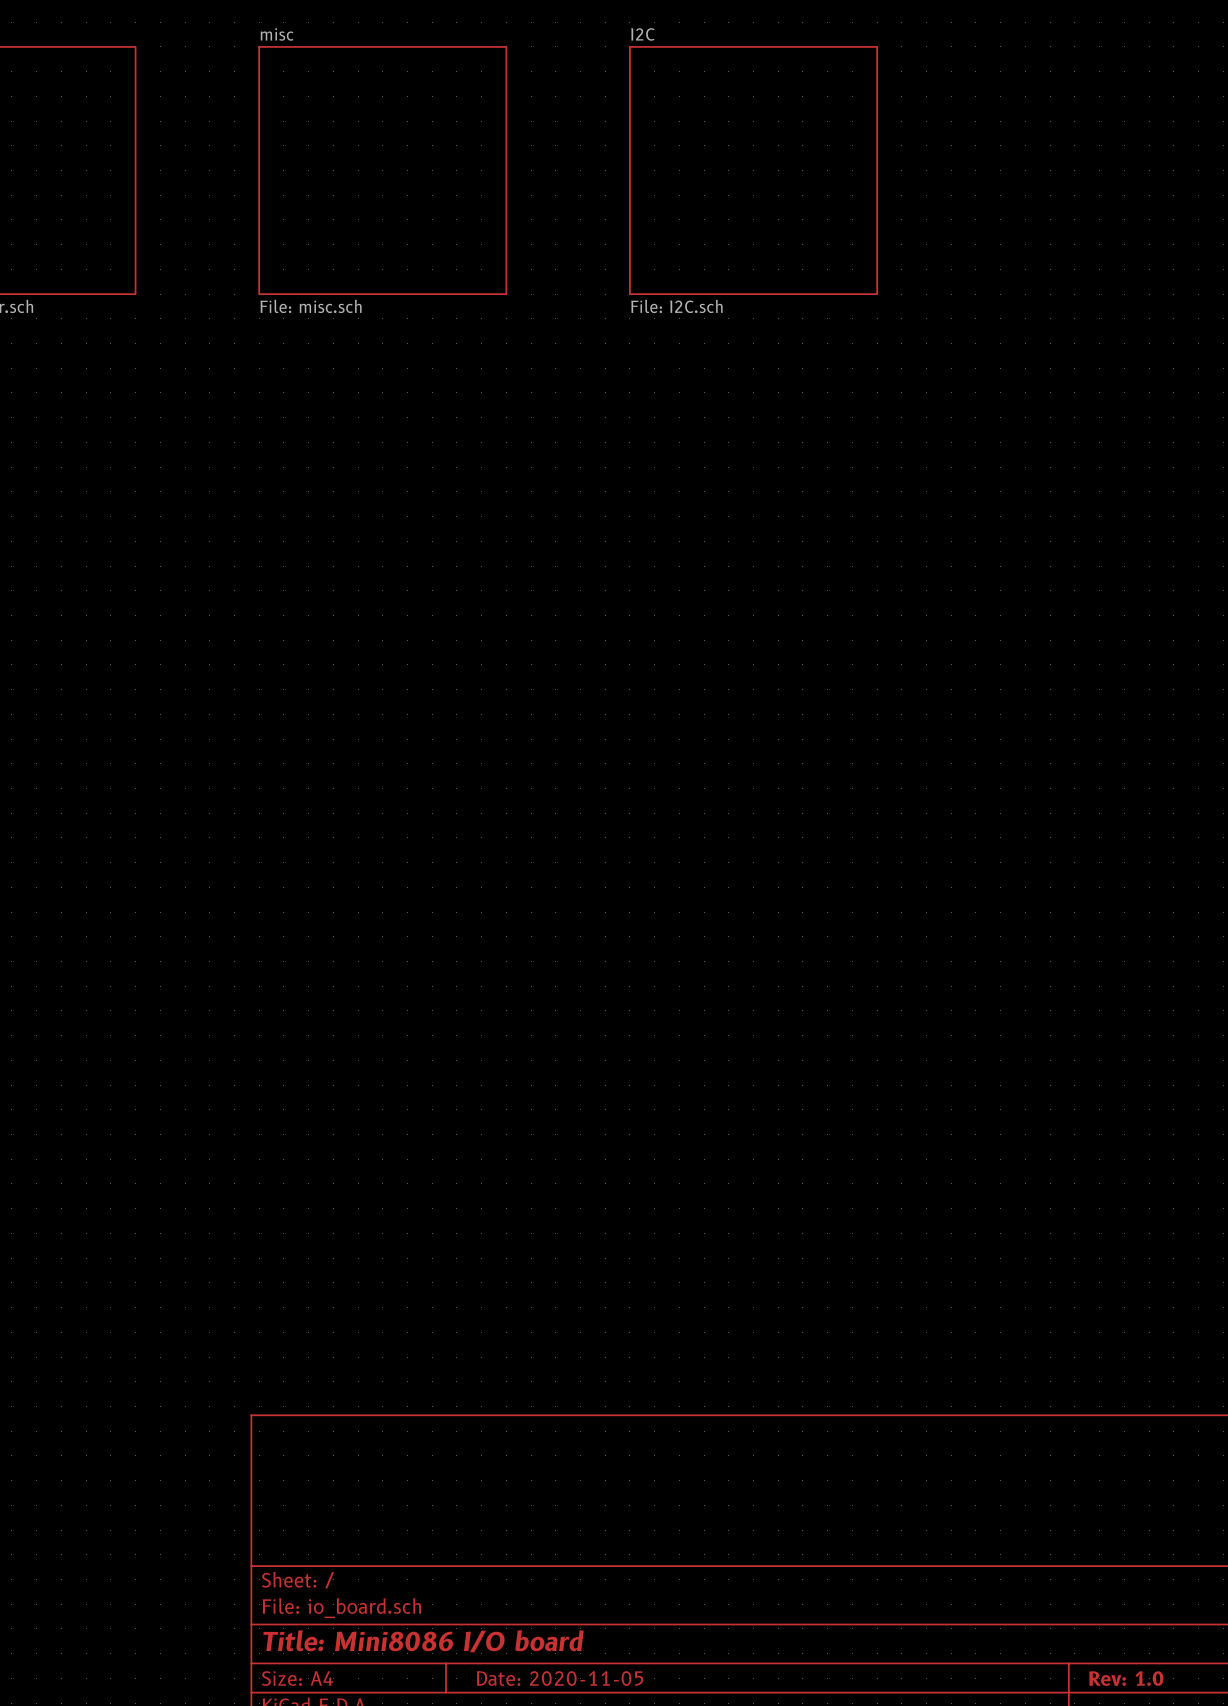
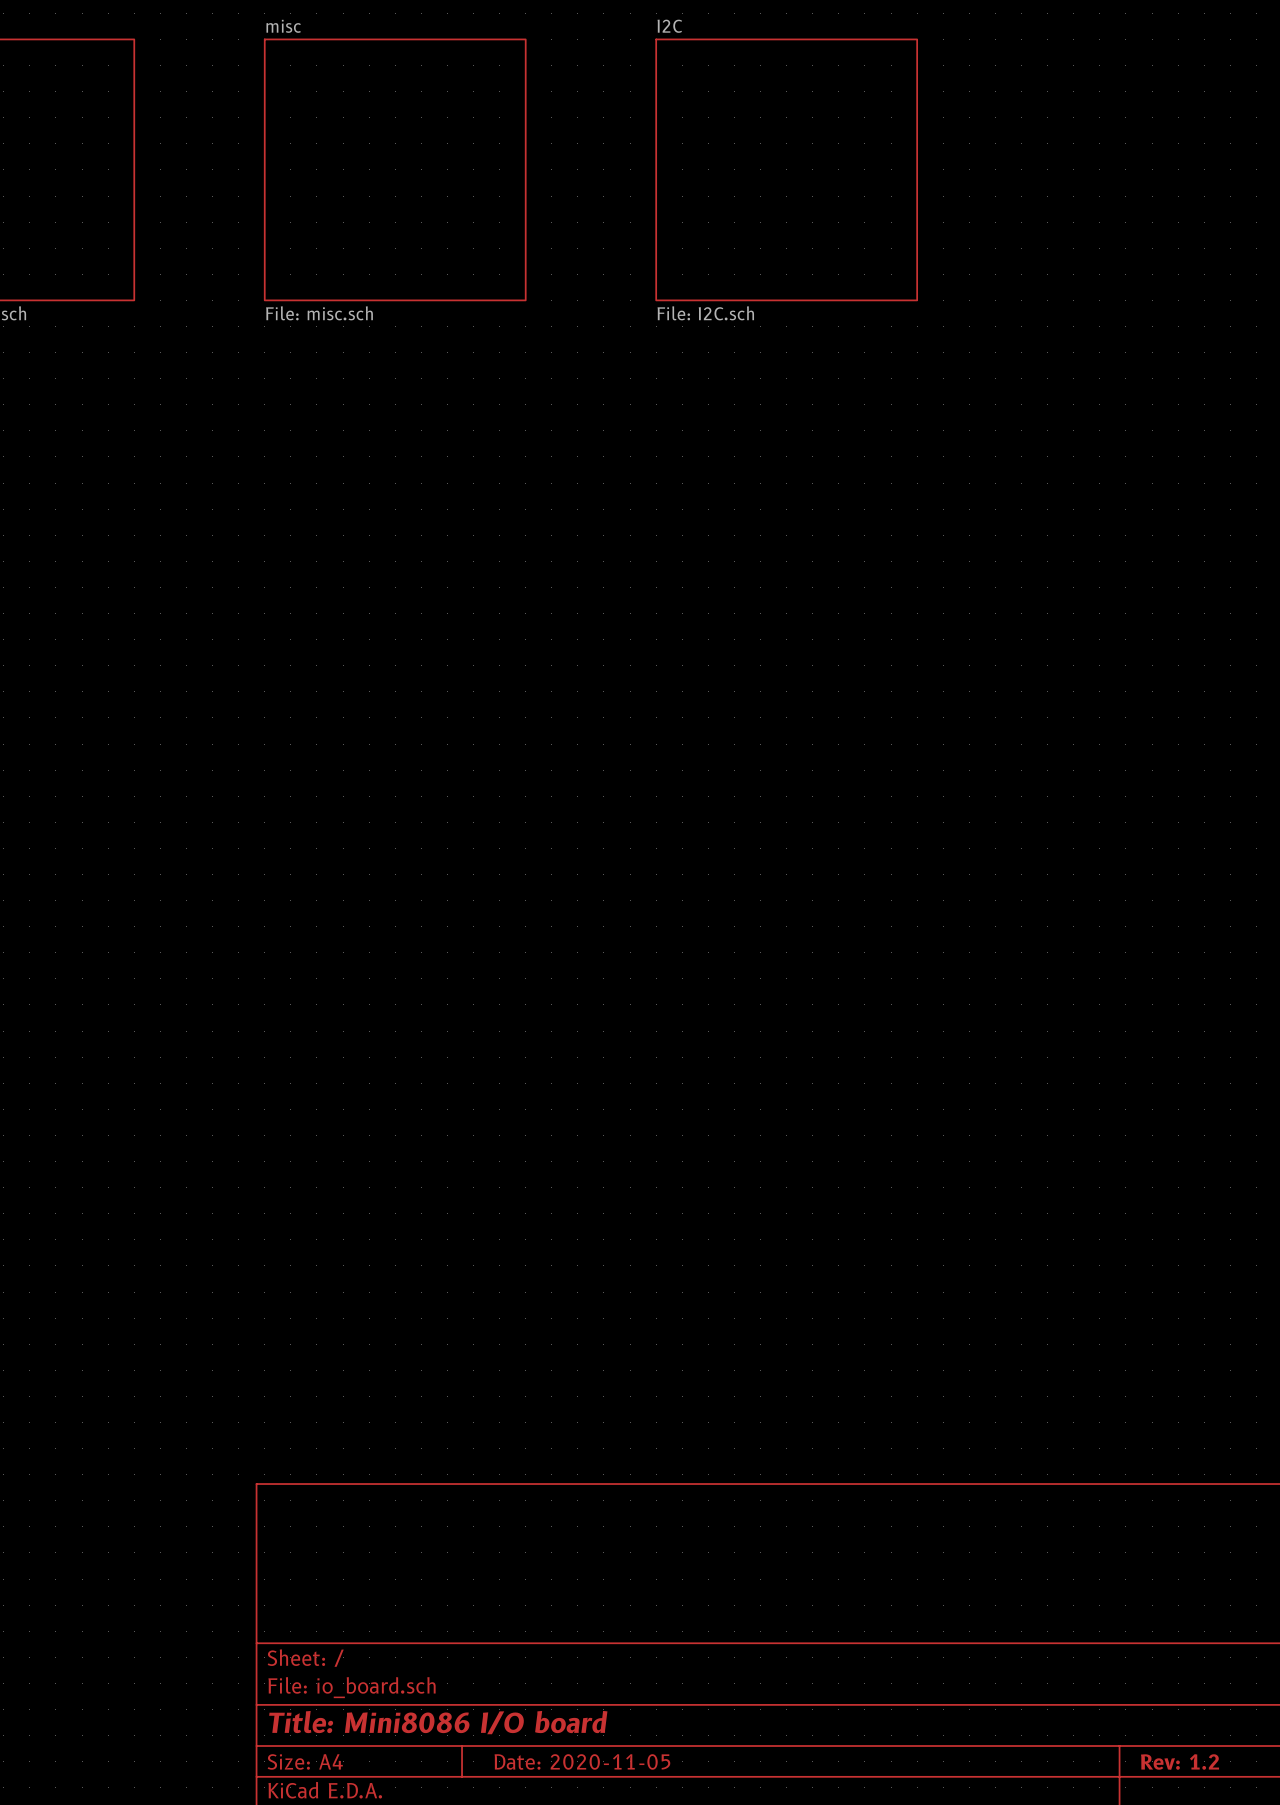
title block: Rev: 1.0 (1126, 1678) -> Rev: 1.2 (1180, 1761)

